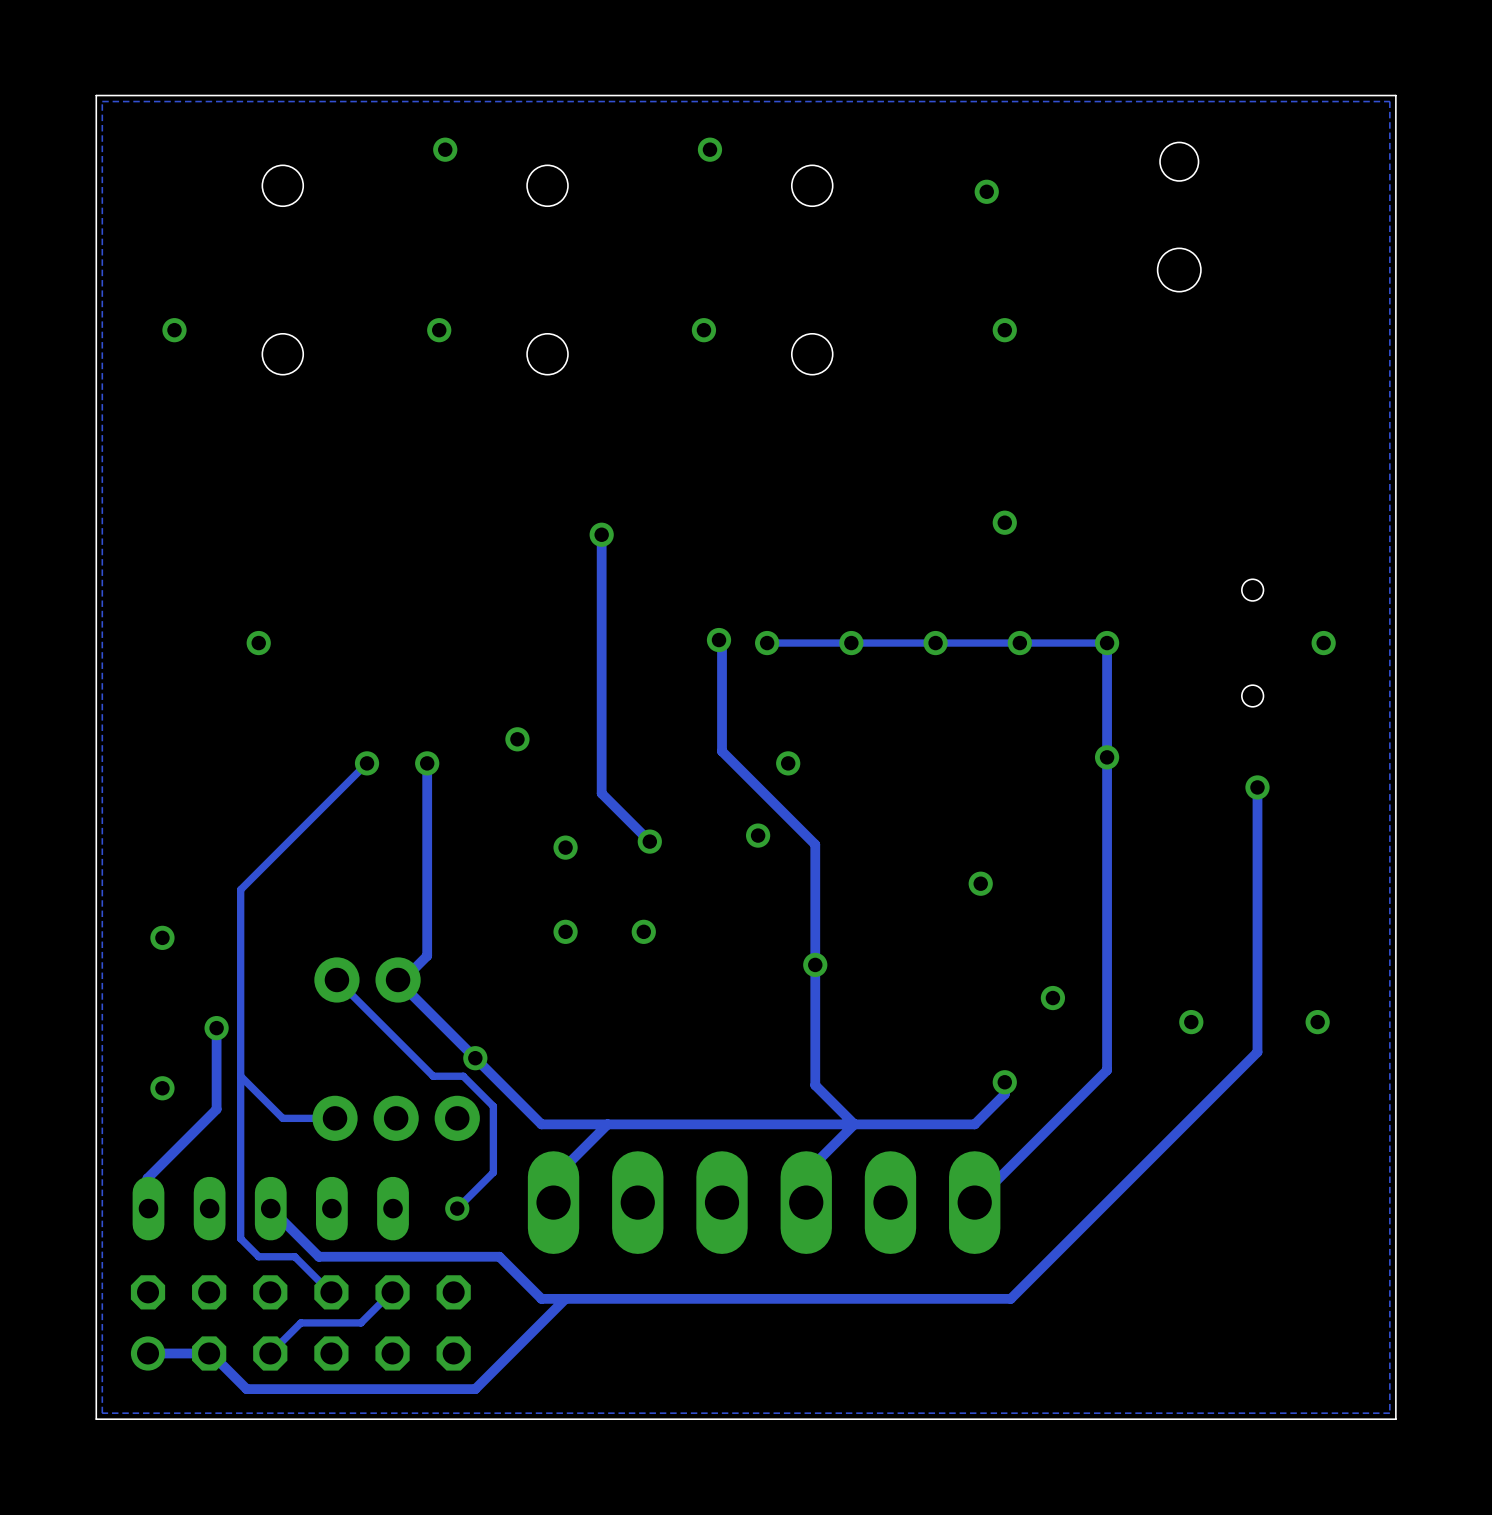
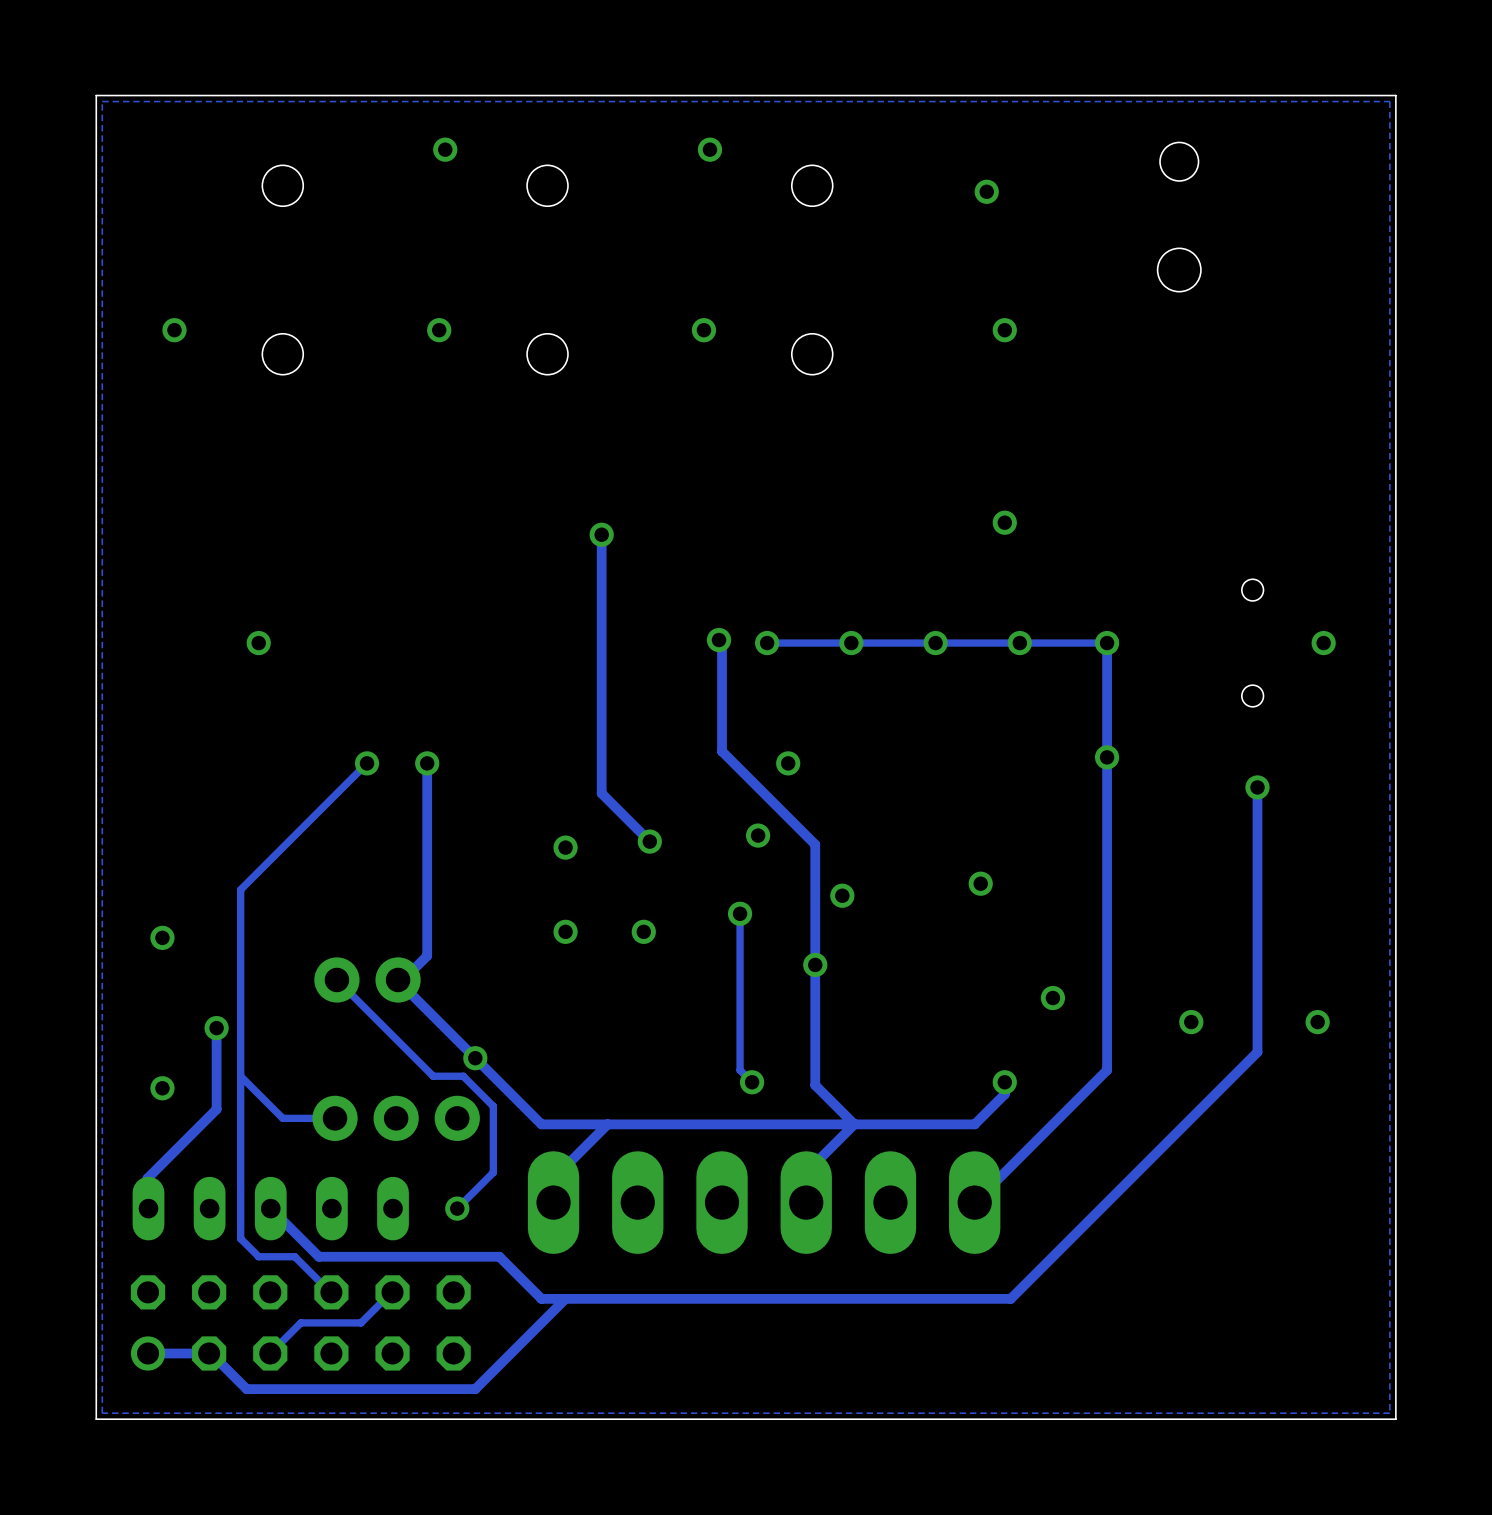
via: (517, 739) -> none
via: none -> (842, 895)
track: none -> (740, 913) (740, 1070) (752, 1082)
via: none -> (740, 913)
via: none -> (752, 1082)

